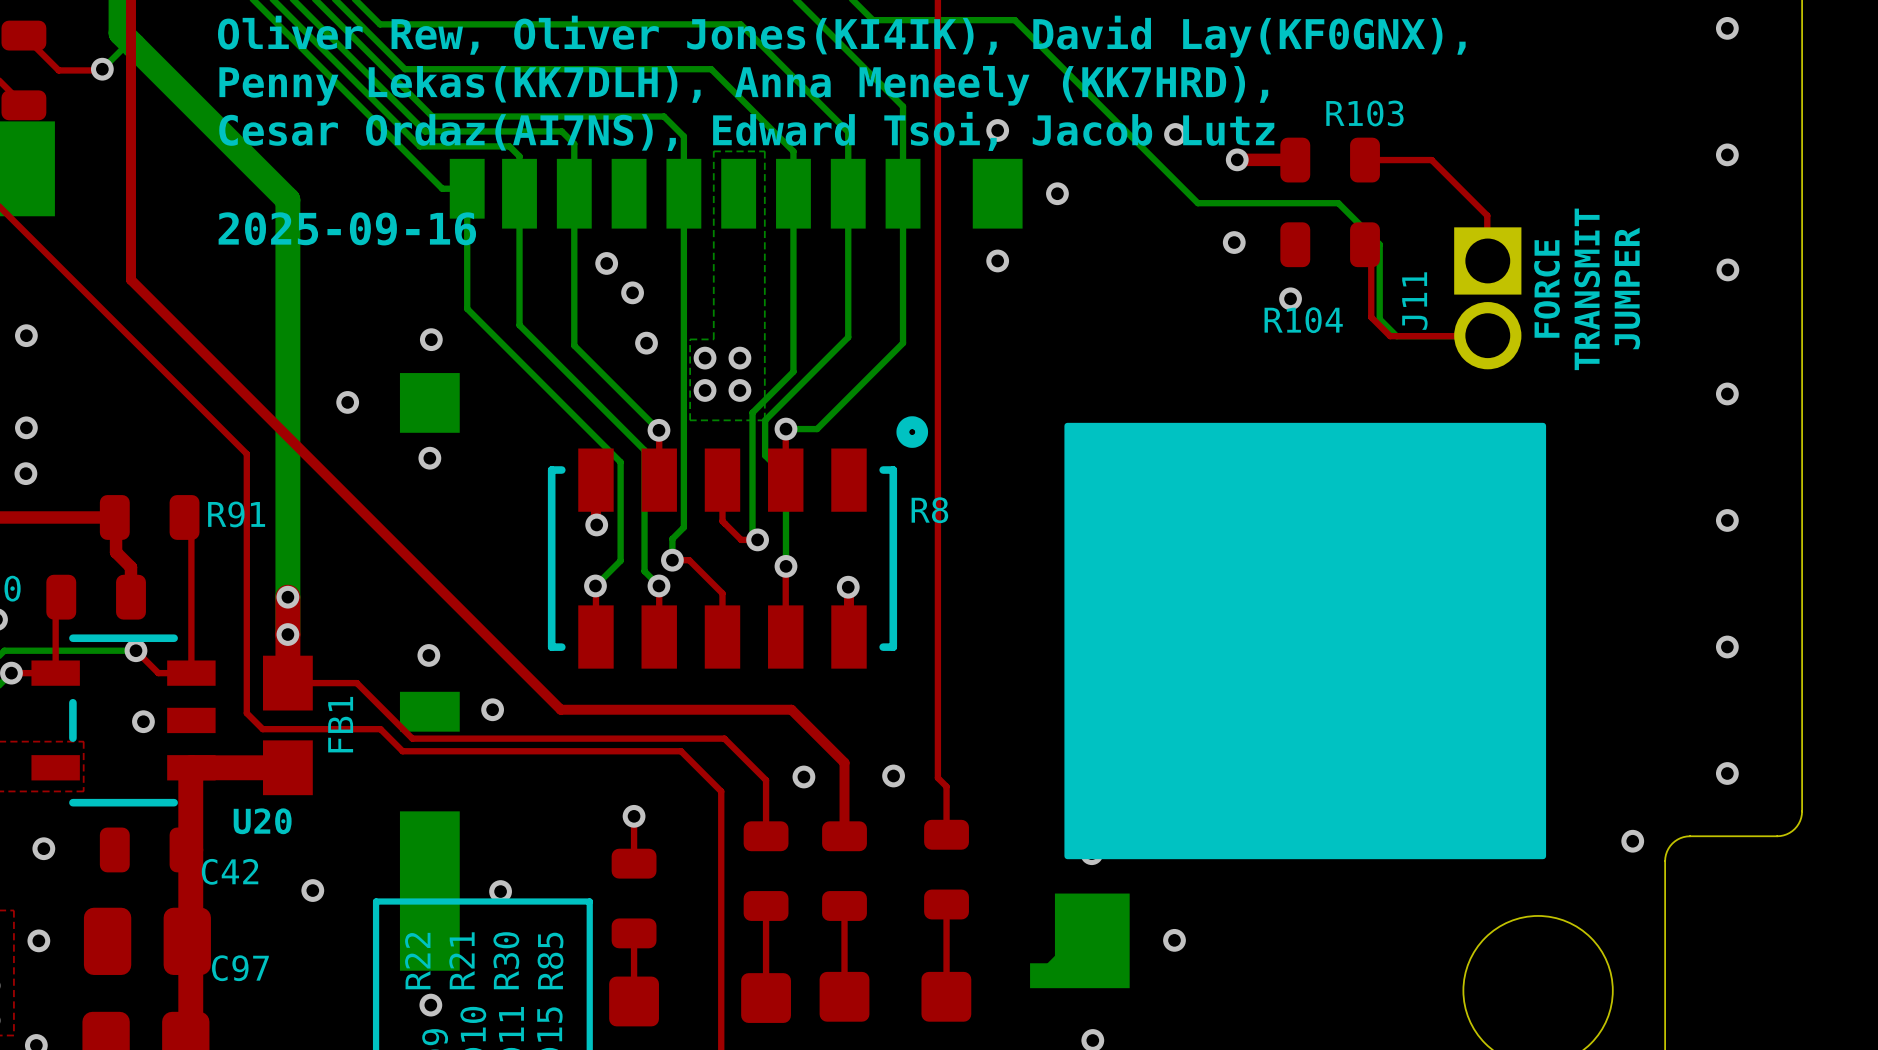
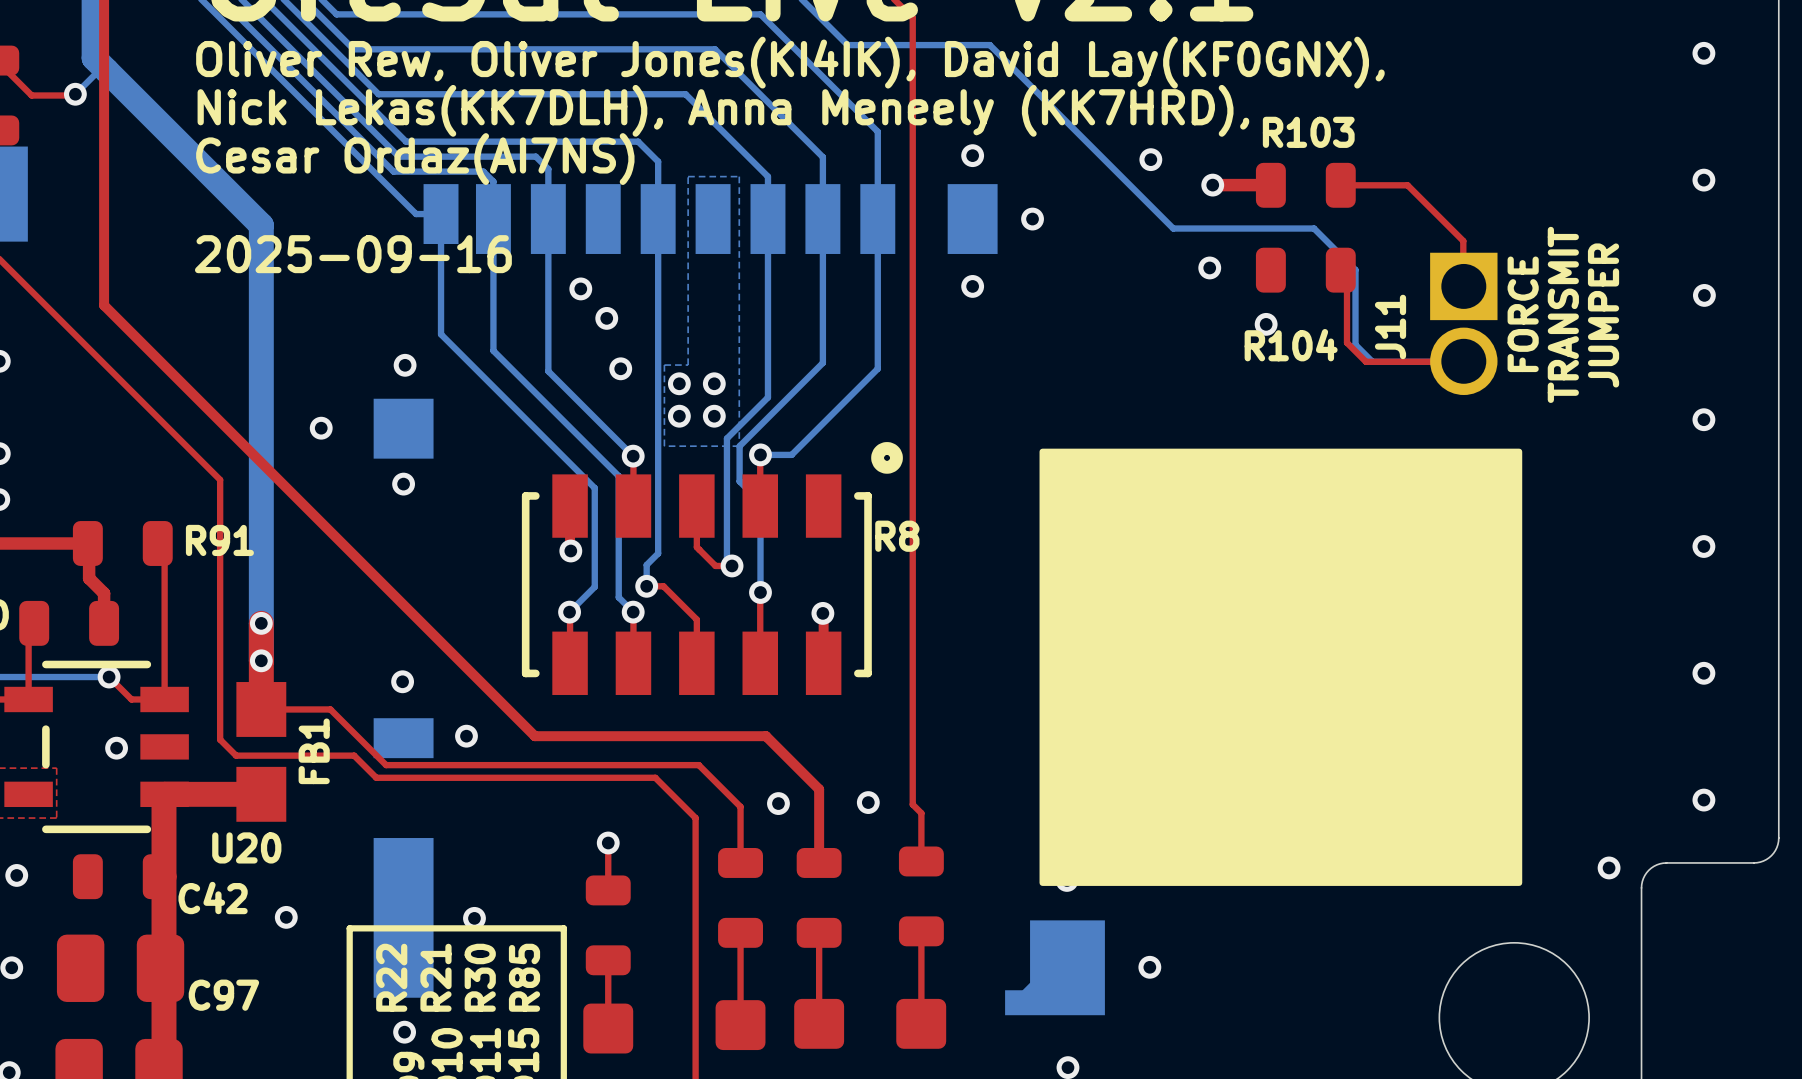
text: Penny Lekas(KK7DLH), Anna Meneely (KK7HRD), (743, 85) -> Nick Lekas(KK7DLH), Anna Meneely (KK7HRD), (723, 110)
R103 name position: R103 (1364, 113) -> R103 (1308, 132)
text: Cesar Ordaz(AI7NS), Edward Tsoi, Jacob Lutz (746, 131) -> Cesar Ordaz(AI7NS) (415, 159)

